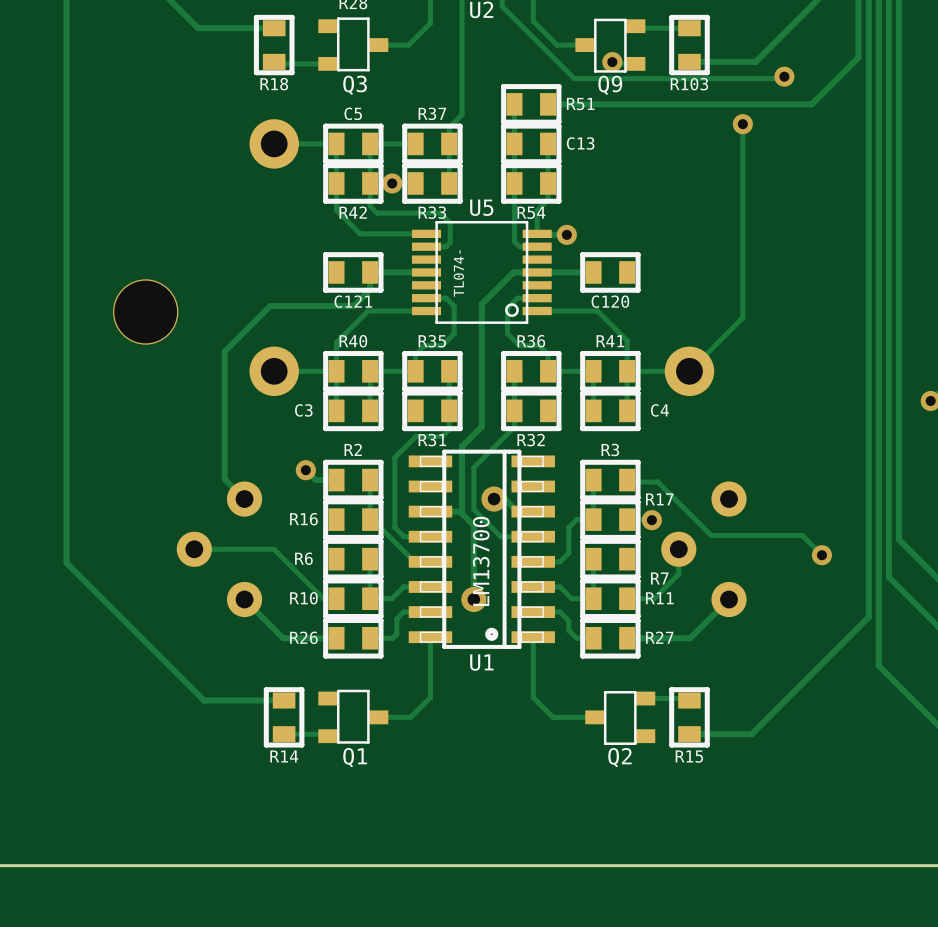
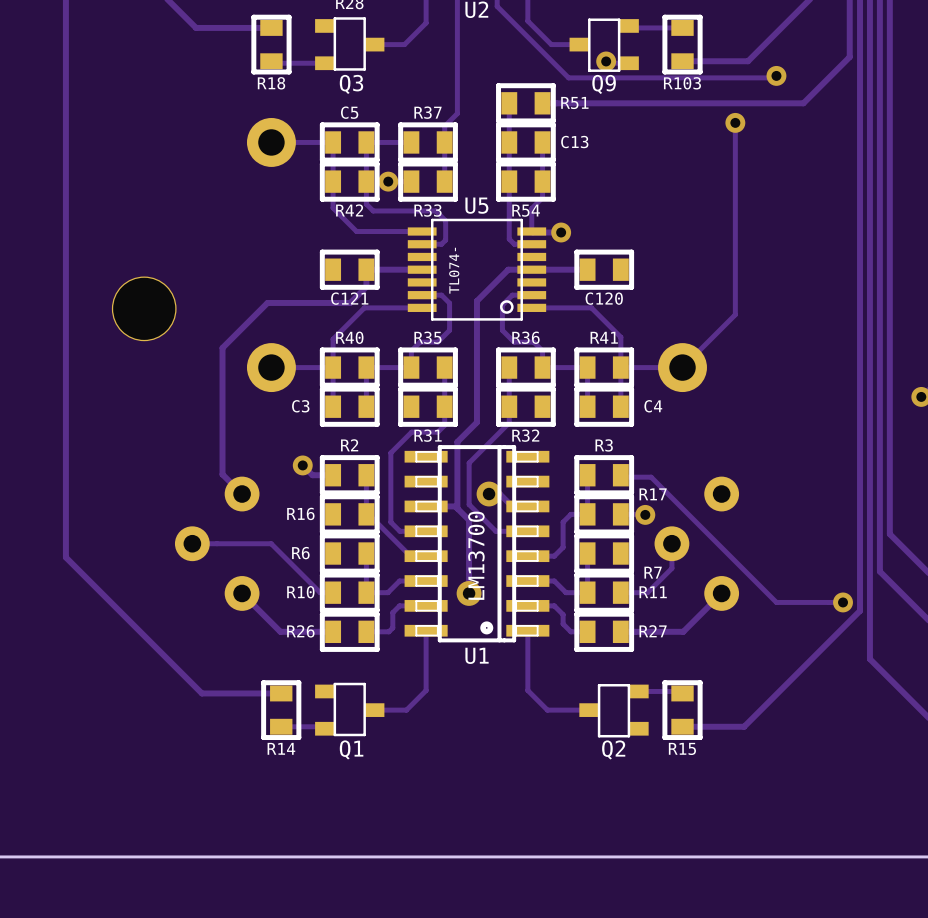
track: (711, 535) (802, 535) (821, 555) -> (704, 530) (776, 602) (843, 602)
via position: (821, 555) -> (843, 602)

